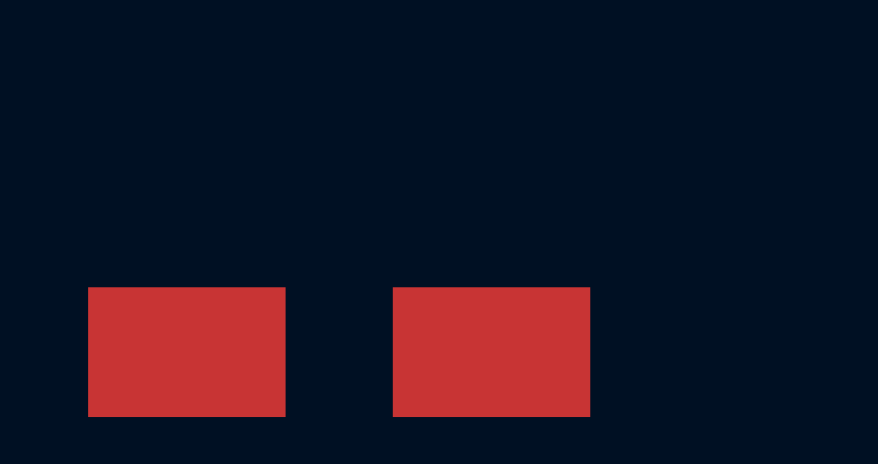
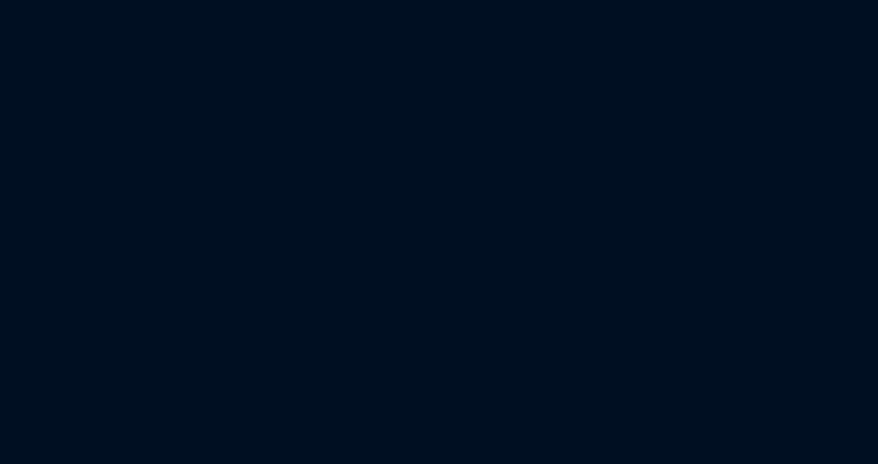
part: (339, 352) -> none

